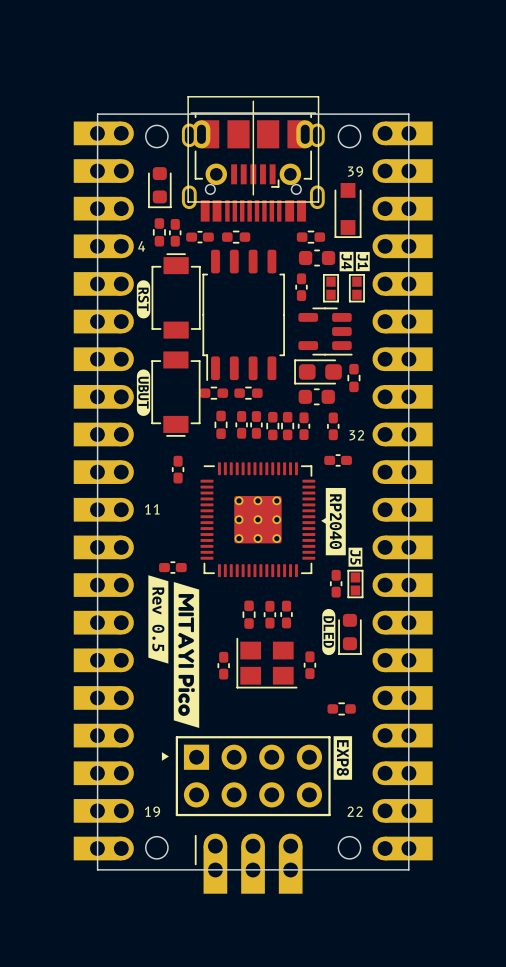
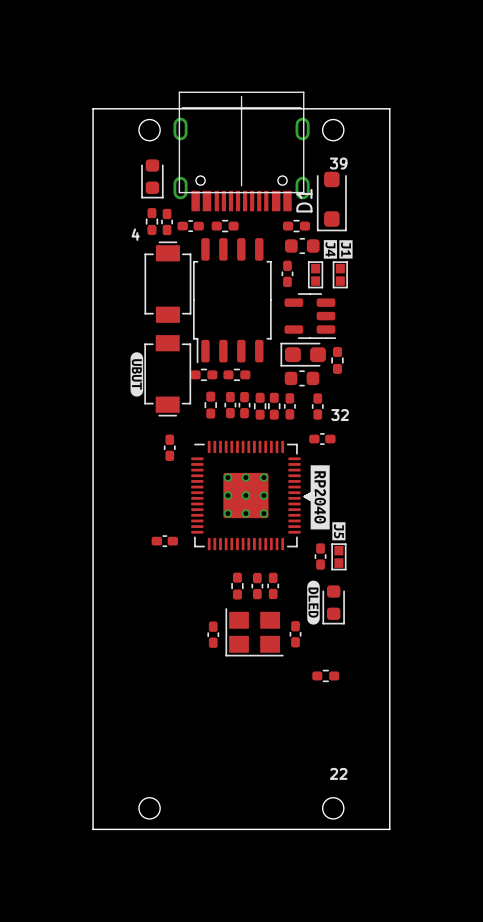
part: (253, 150) -> none
part: (348, 210) -> none
D1: none -> (331, 201)
drawing: [136, 280, 151, 319] -> none
part: (103, 490) -> none
part: (402, 490) -> none
text: 11 (152, 509) -> none
drawing: [148, 575, 200, 728] -> none
drawing: [333, 736, 353, 780] -> none
line: (176, 737) (329, 737) (329, 815) (176, 815) (176, 737) -> none
text: ▼ (165, 756) -> none
part: (252, 776) -> none
text: 19 (152, 811) -> none
part: (248, 863) -> none

